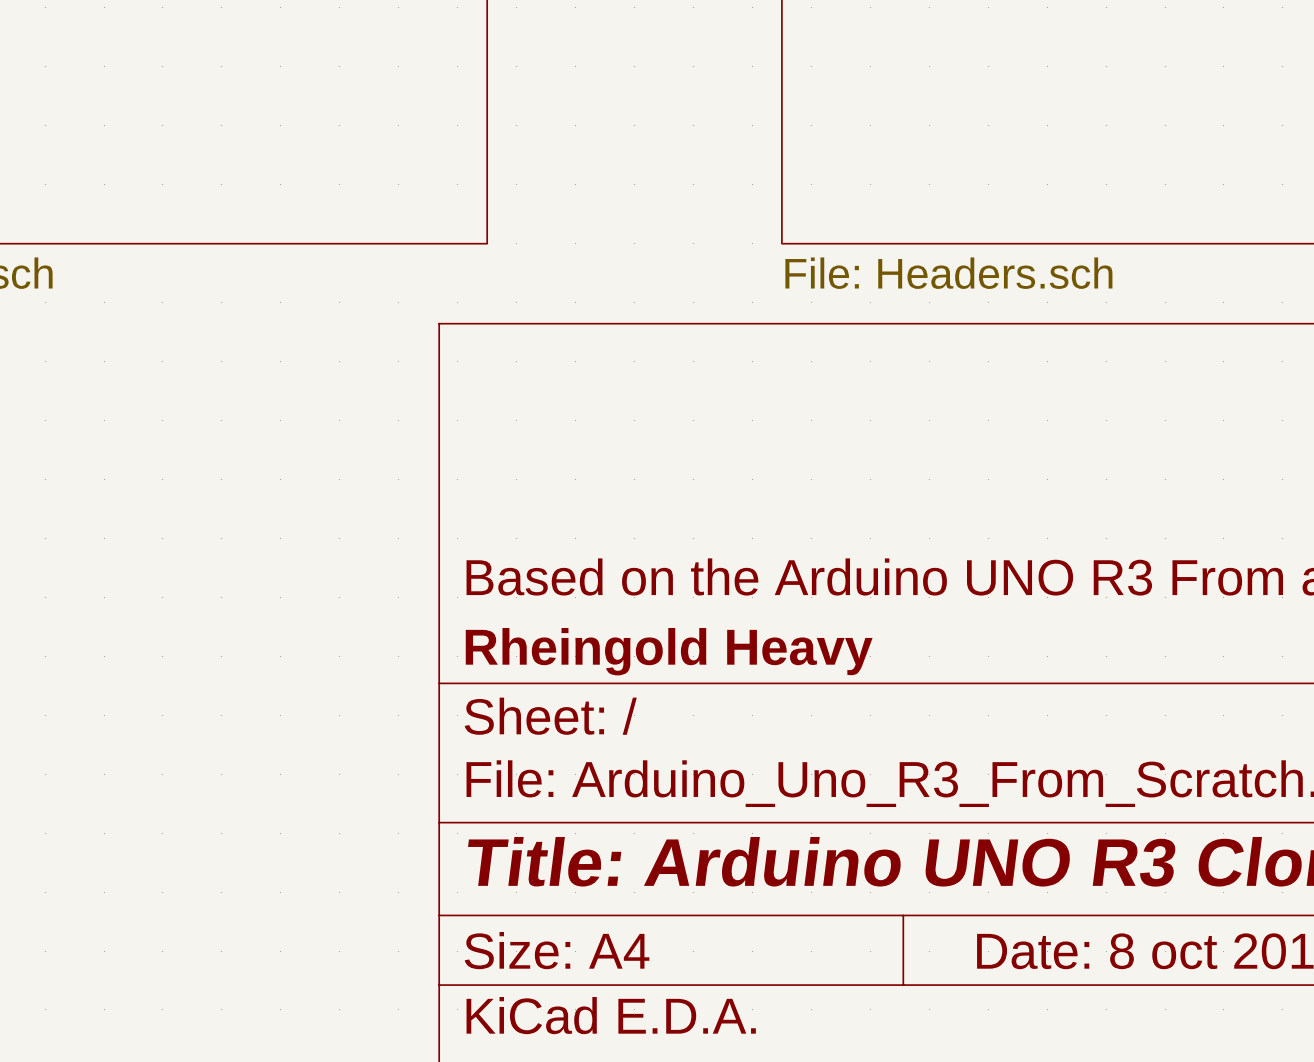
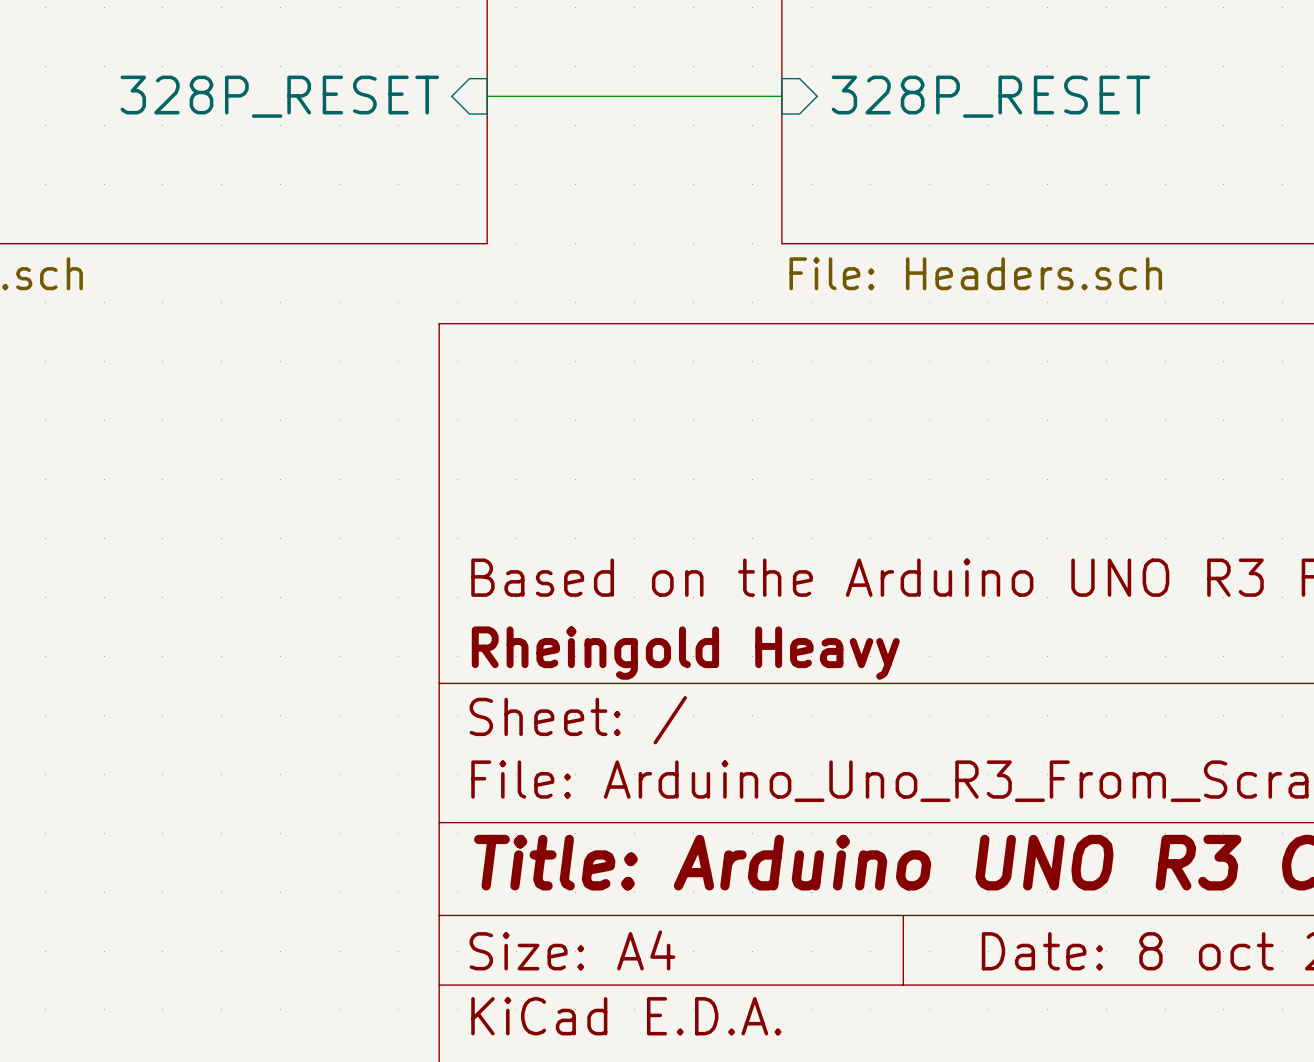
wire: none -> (487, 96) (781, 96)
sheet pin: none -> 328P_RESET (279, 96)
sheet pin: none -> 328P_RESET (990, 96)

